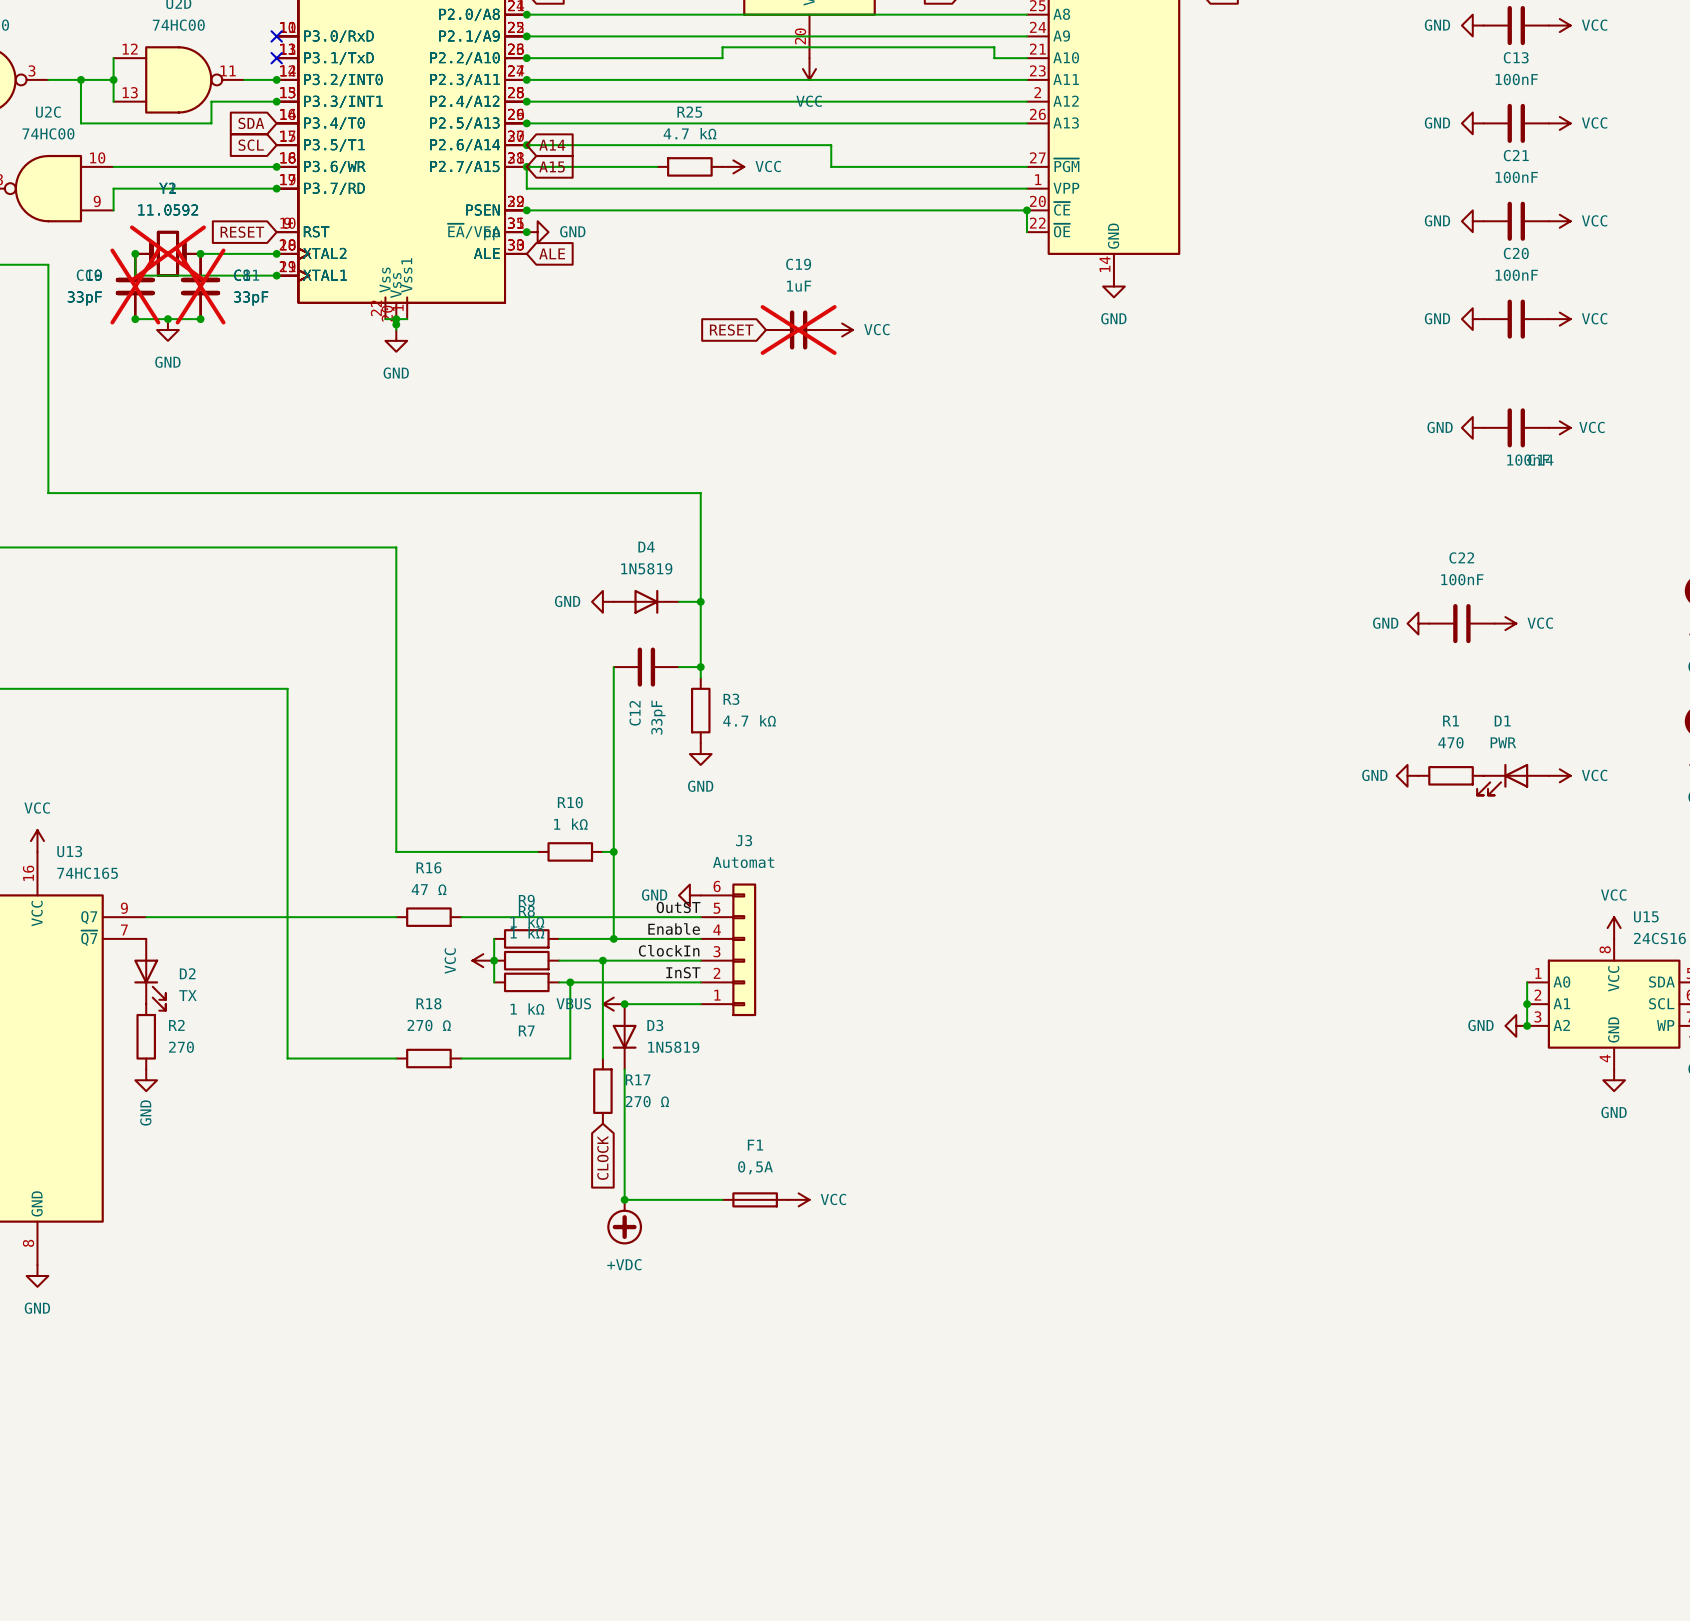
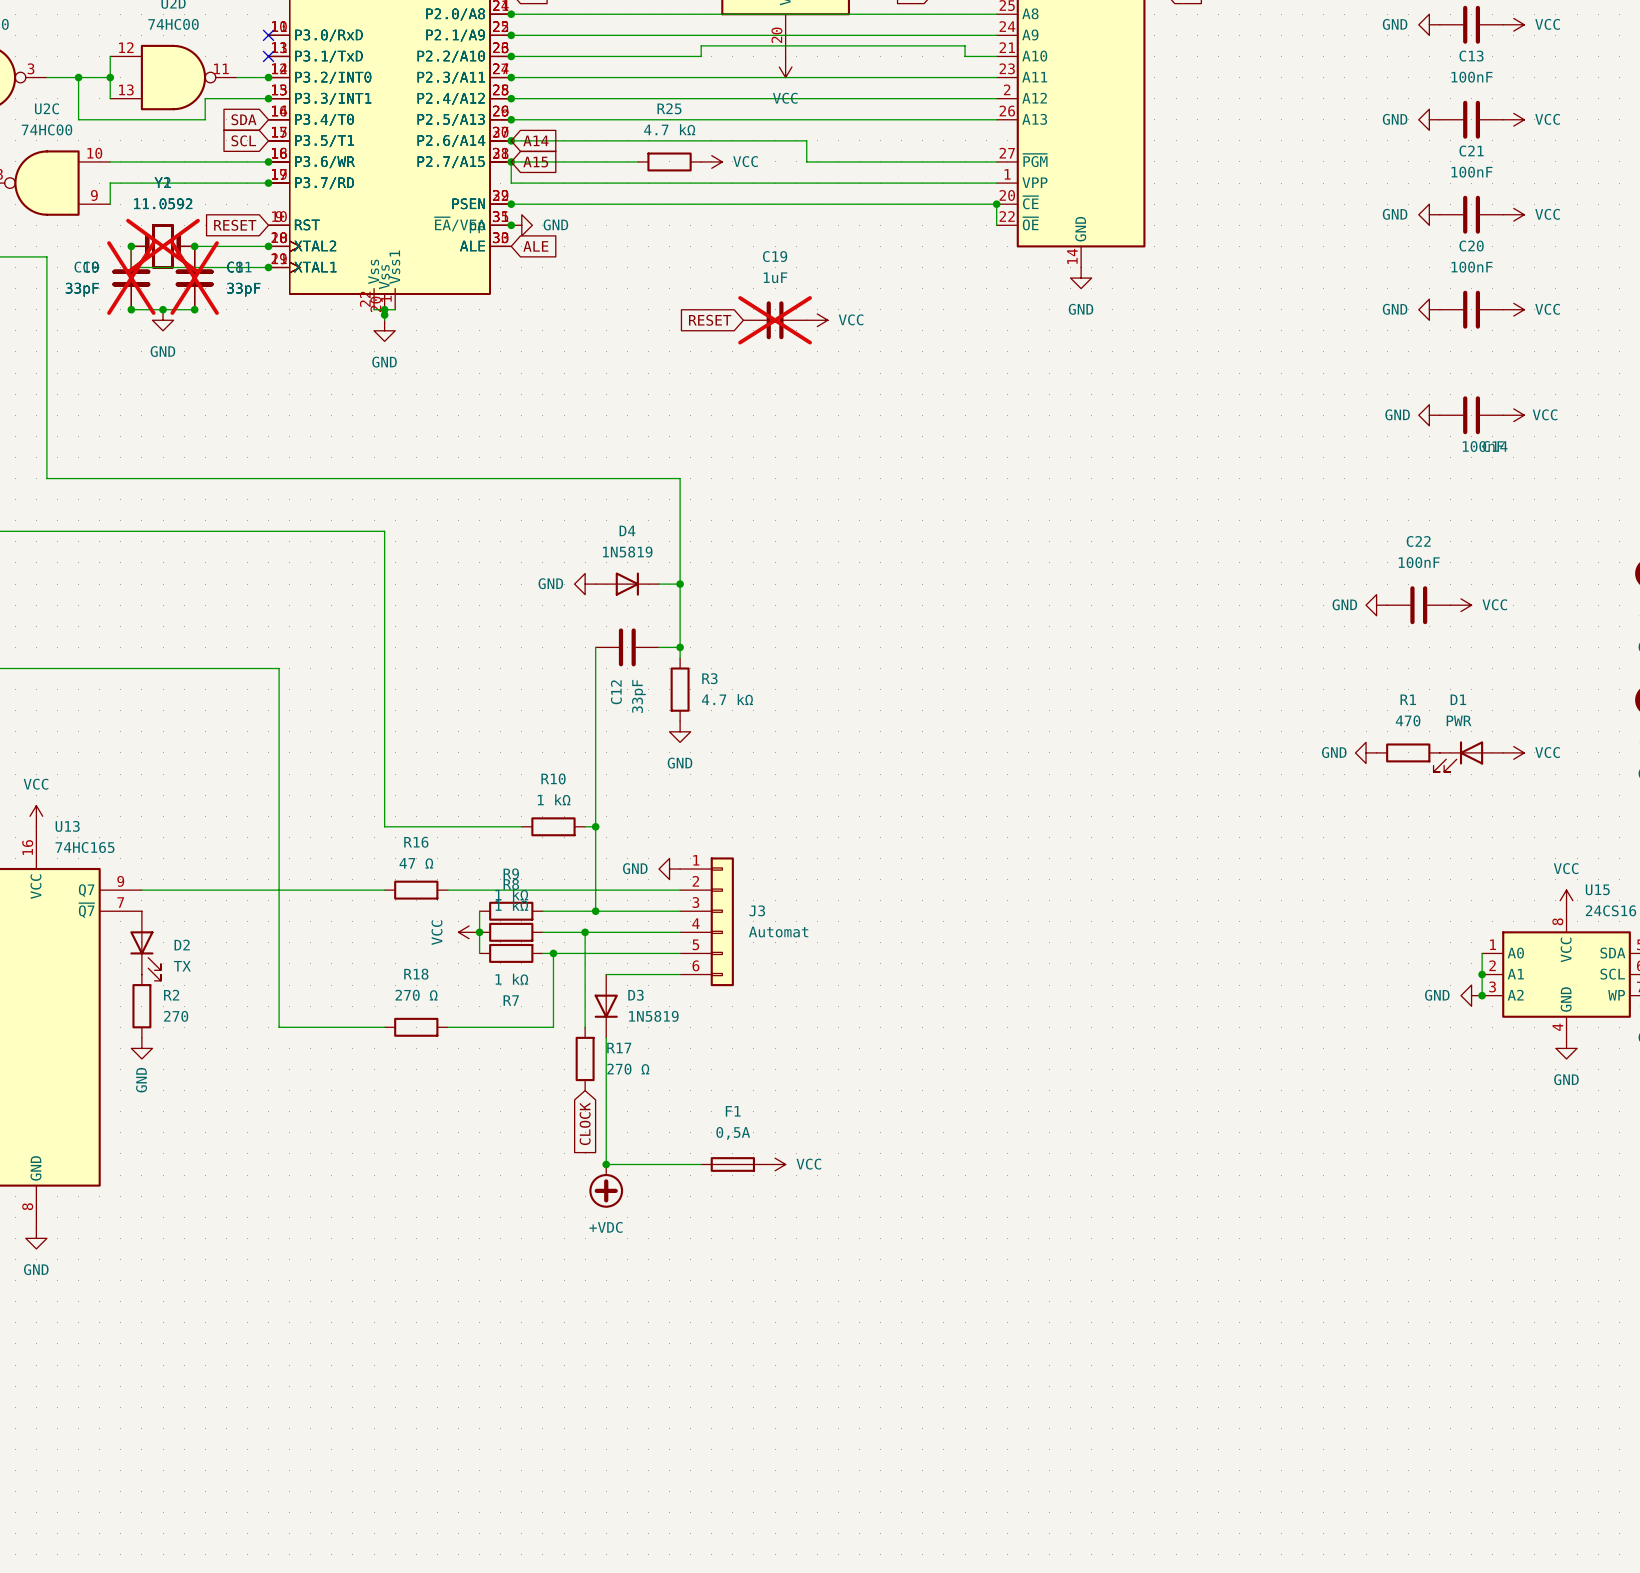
J3 name position: J3 (744, 840) -> J3 (757, 910)
J3 value position: Automat (743, 862) -> Automat (778, 932)
label: OutST (678, 907) -> none
label: Enable (674, 929) -> none
J3 flip: as is (744, 949) -> up-down (722, 921)
label: ClockIn (669, 950) -> none
label: InST (683, 972) -> none
power symbol: VBUS (613, 1004) -> none
junction: (624, 1004) -> none

